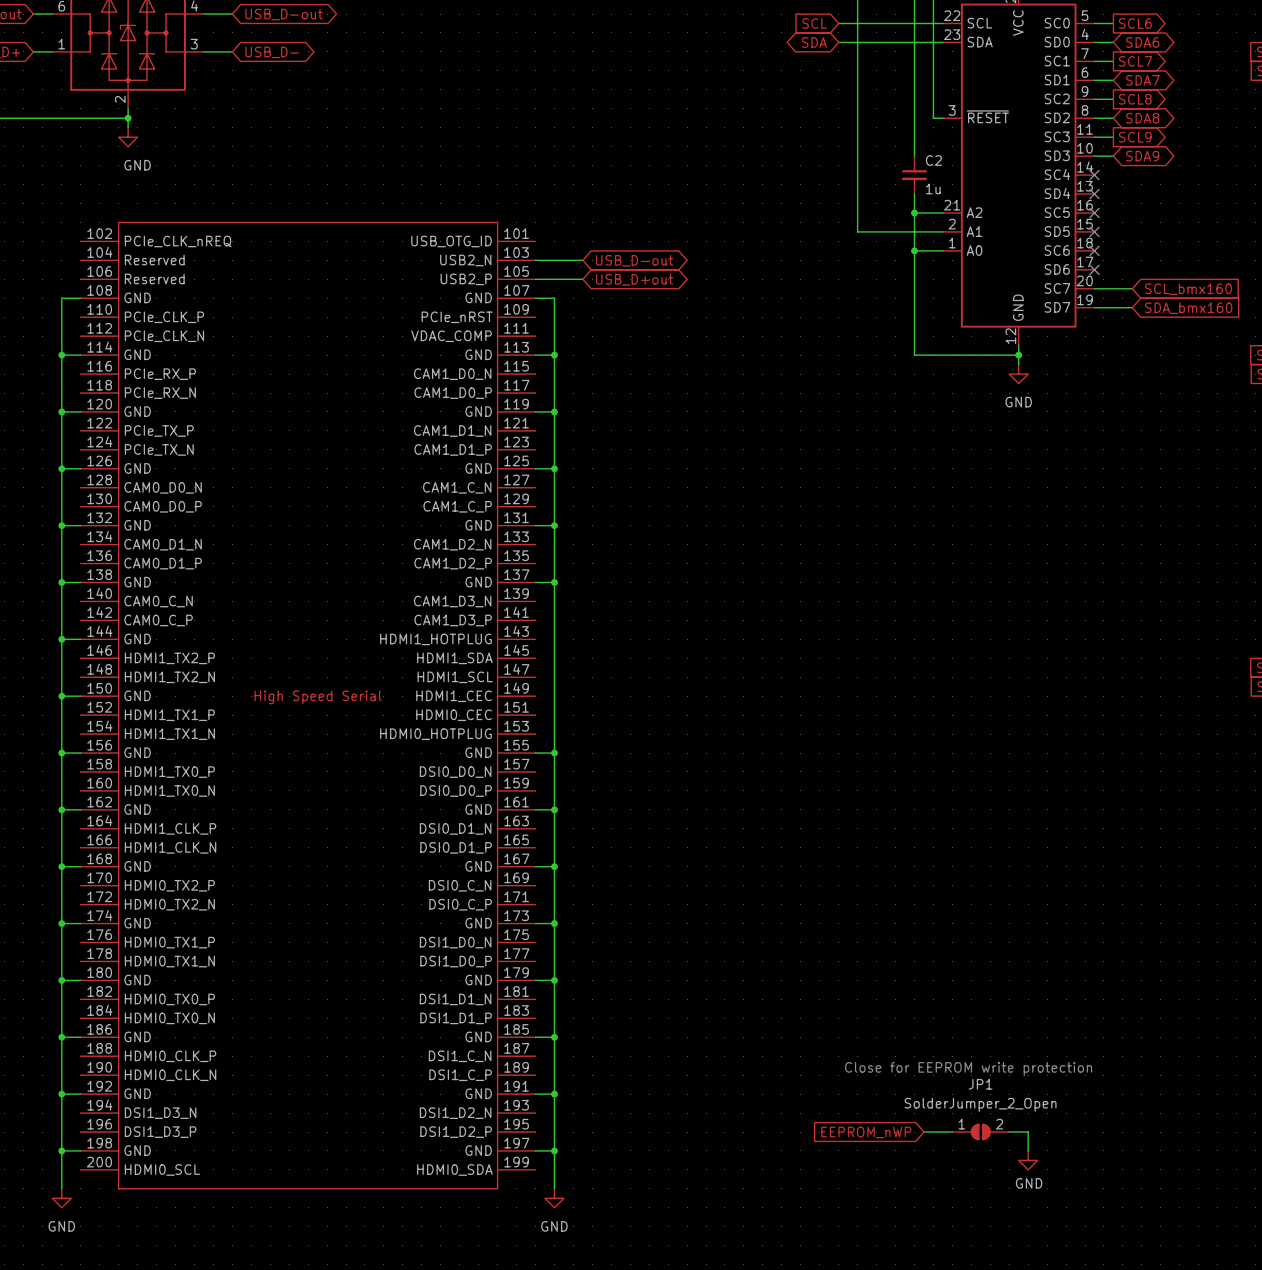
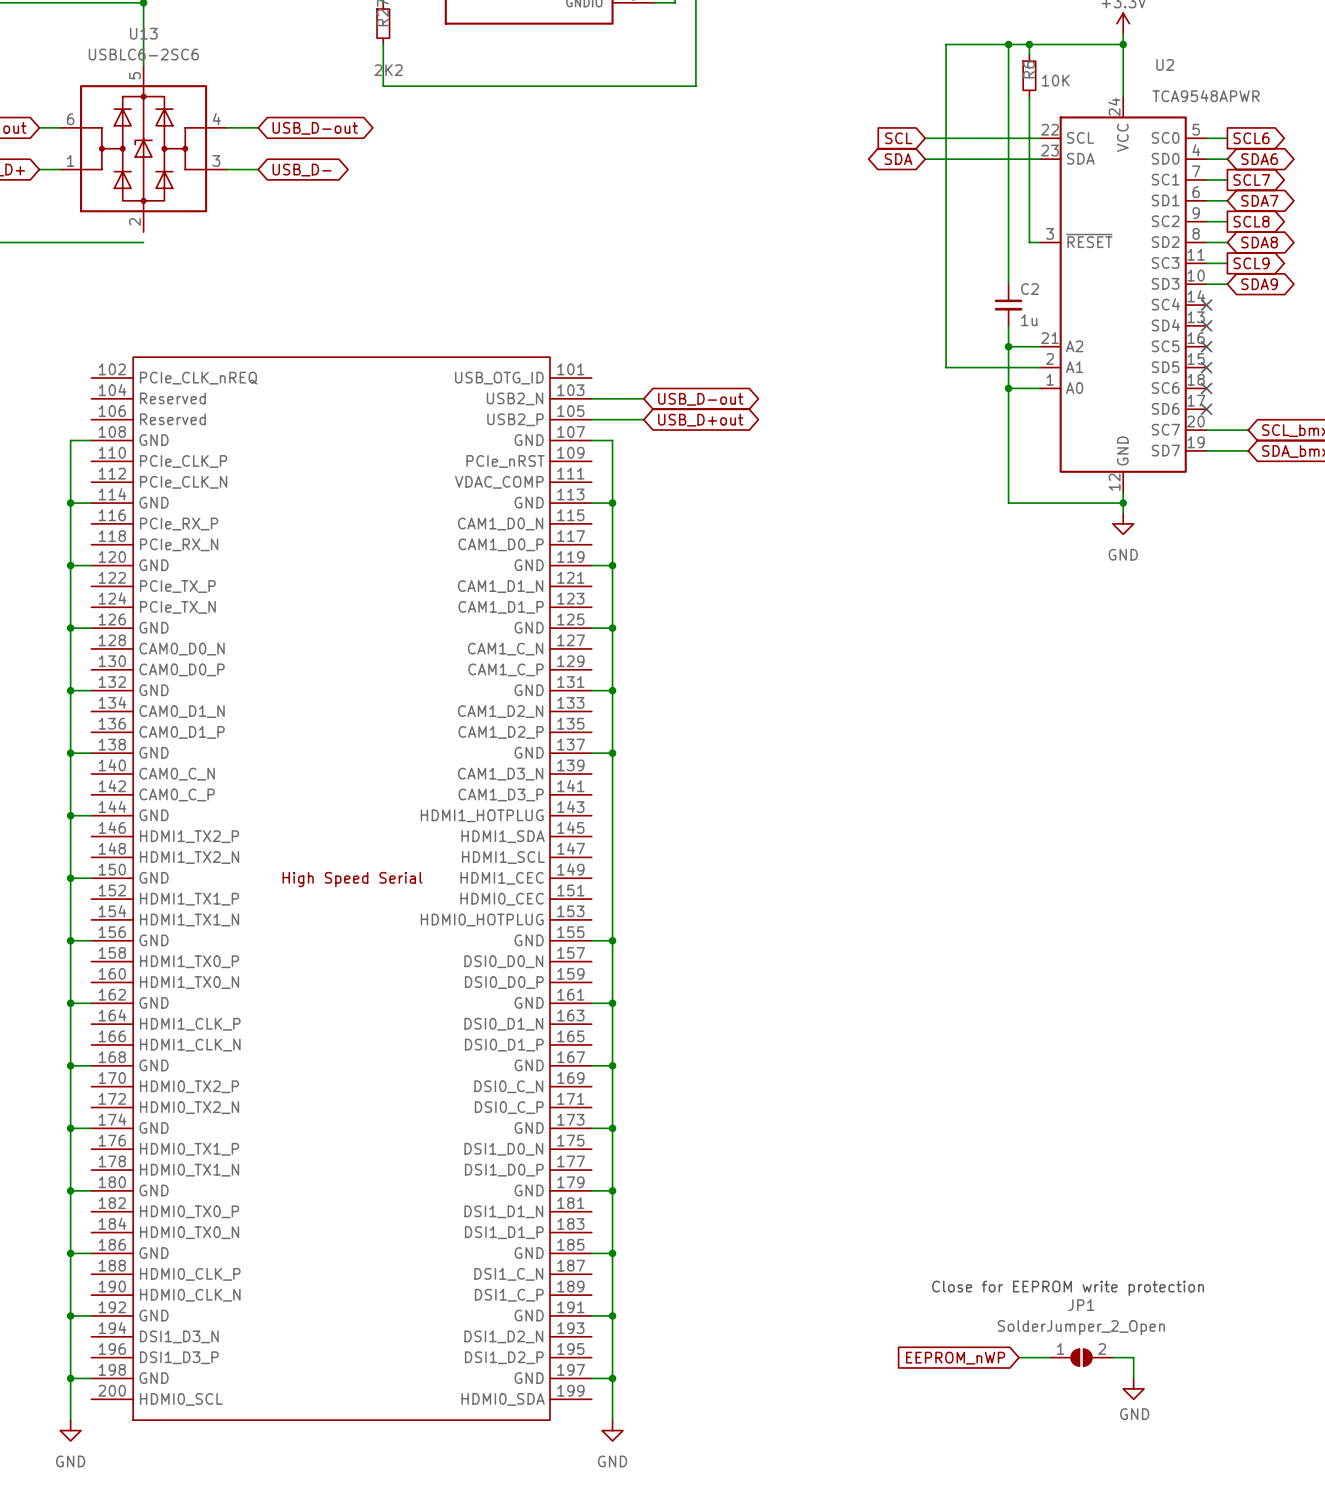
wire: (128, 108) (128, 127) -> none
junction: (128, 118) -> none
power symbol: GND (128, 137) -> none

